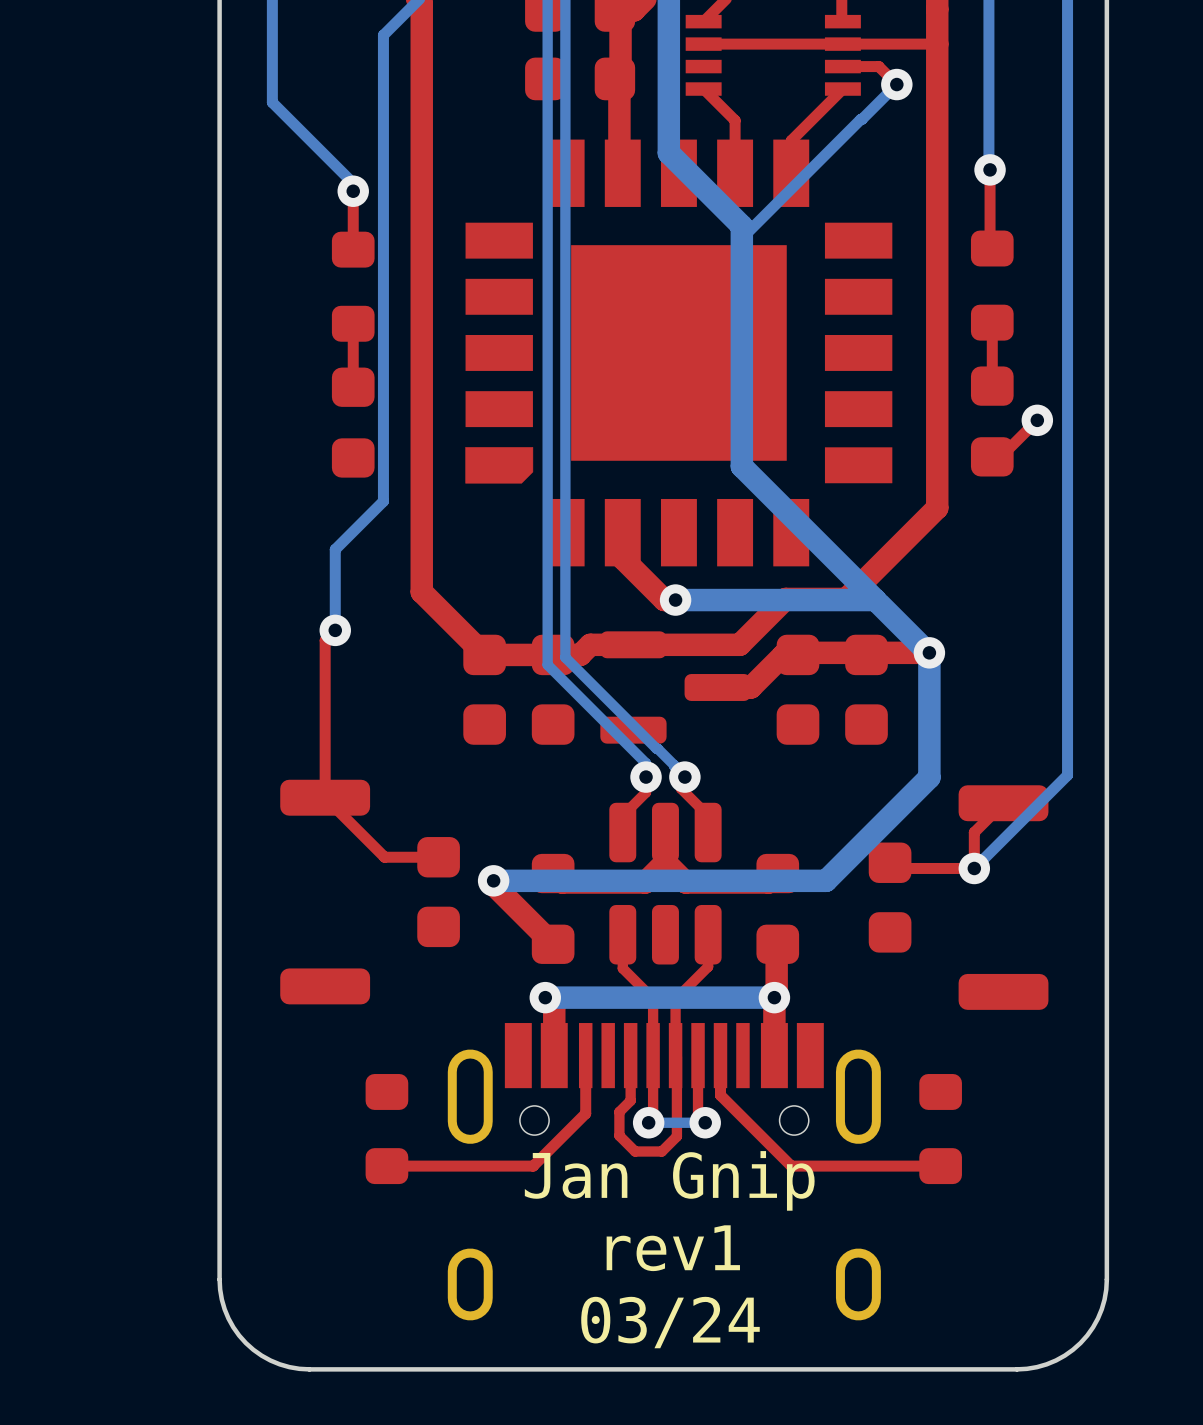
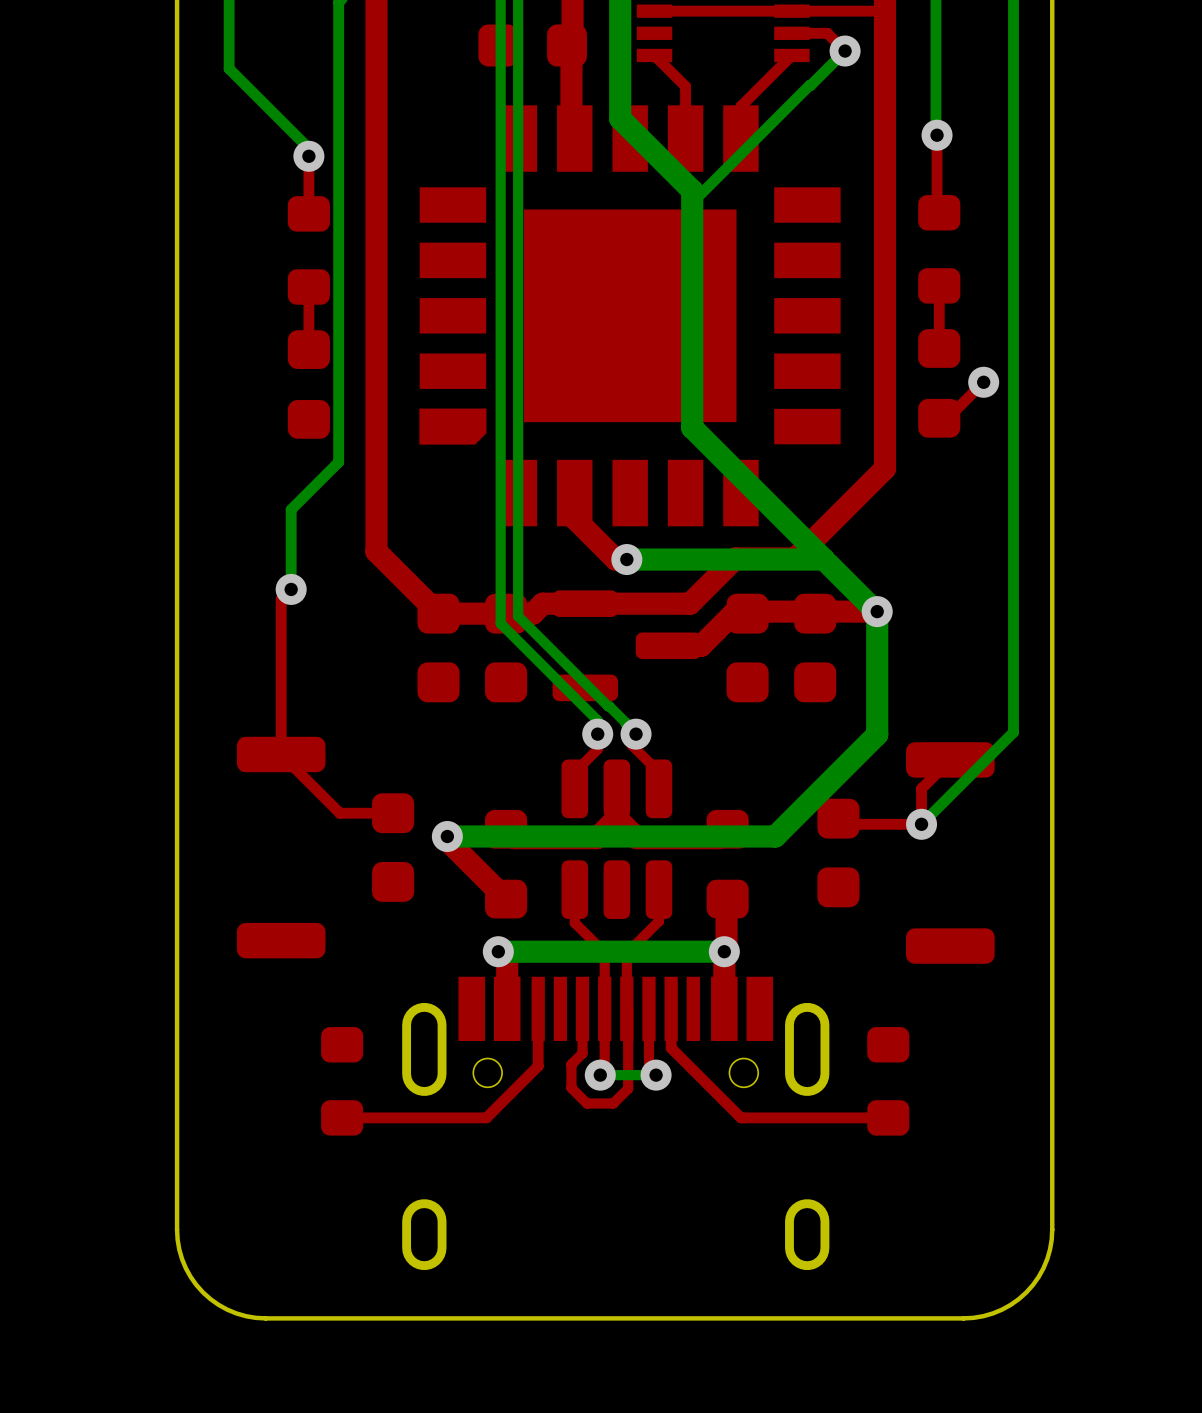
text: Jan Gnip (669, 1180) -> none
text: rev1 (673, 1248) -> none
text: 03/24 (670, 1322) -> none

